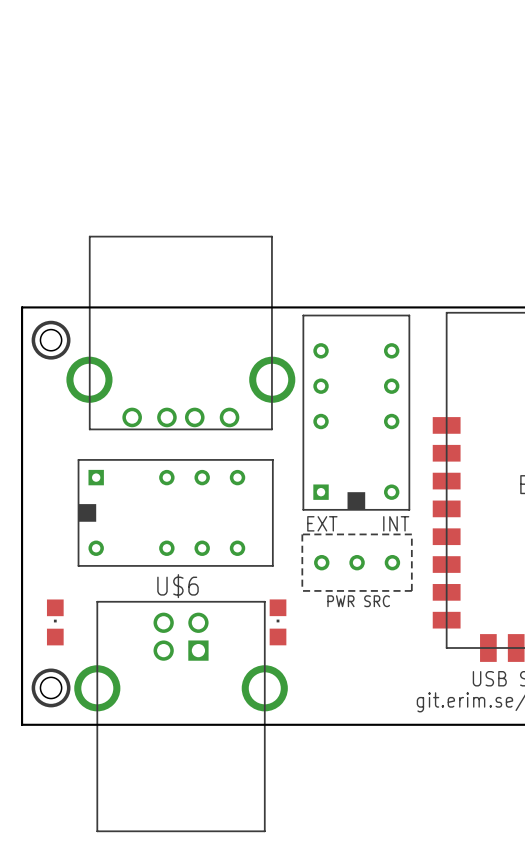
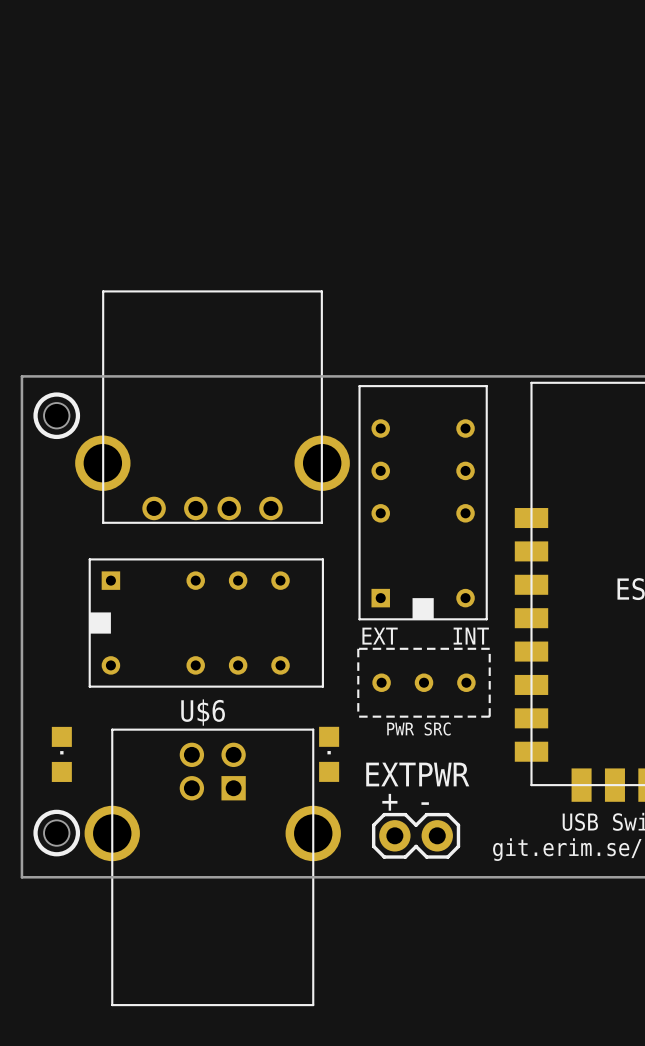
text: none -> EXTPWR (417, 774)
text: none -> + - (405, 802)
part: none -> (416, 835)

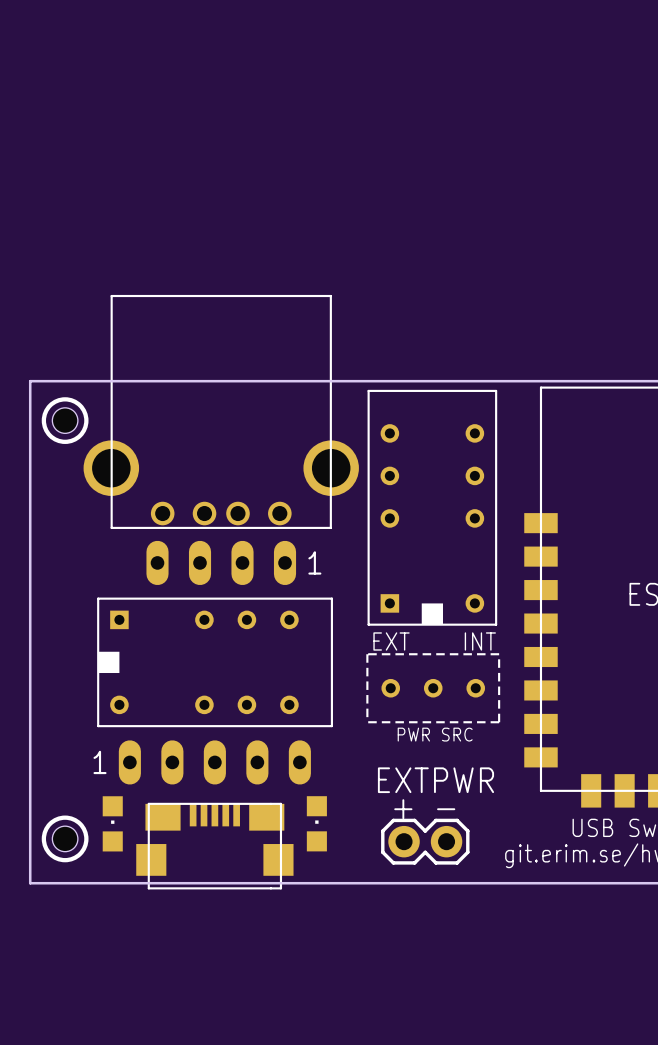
part: none -> (221, 562)
part position: (206, 623) -> (215, 662)
part position: (61, 754) -> (112, 823)
part position: (329, 754) -> (316, 823)
part: none -> (214, 762)
part: none -> (214, 846)
U$6: (212, 867) -> none

